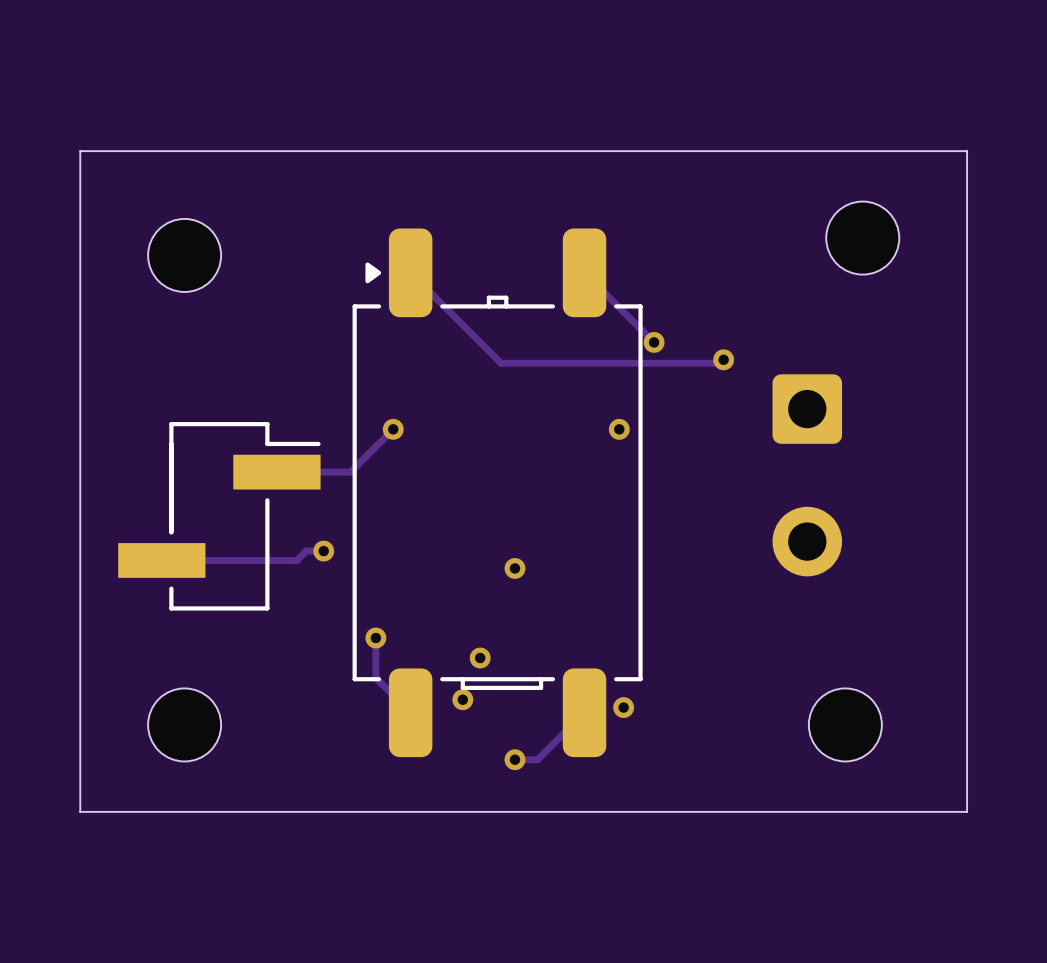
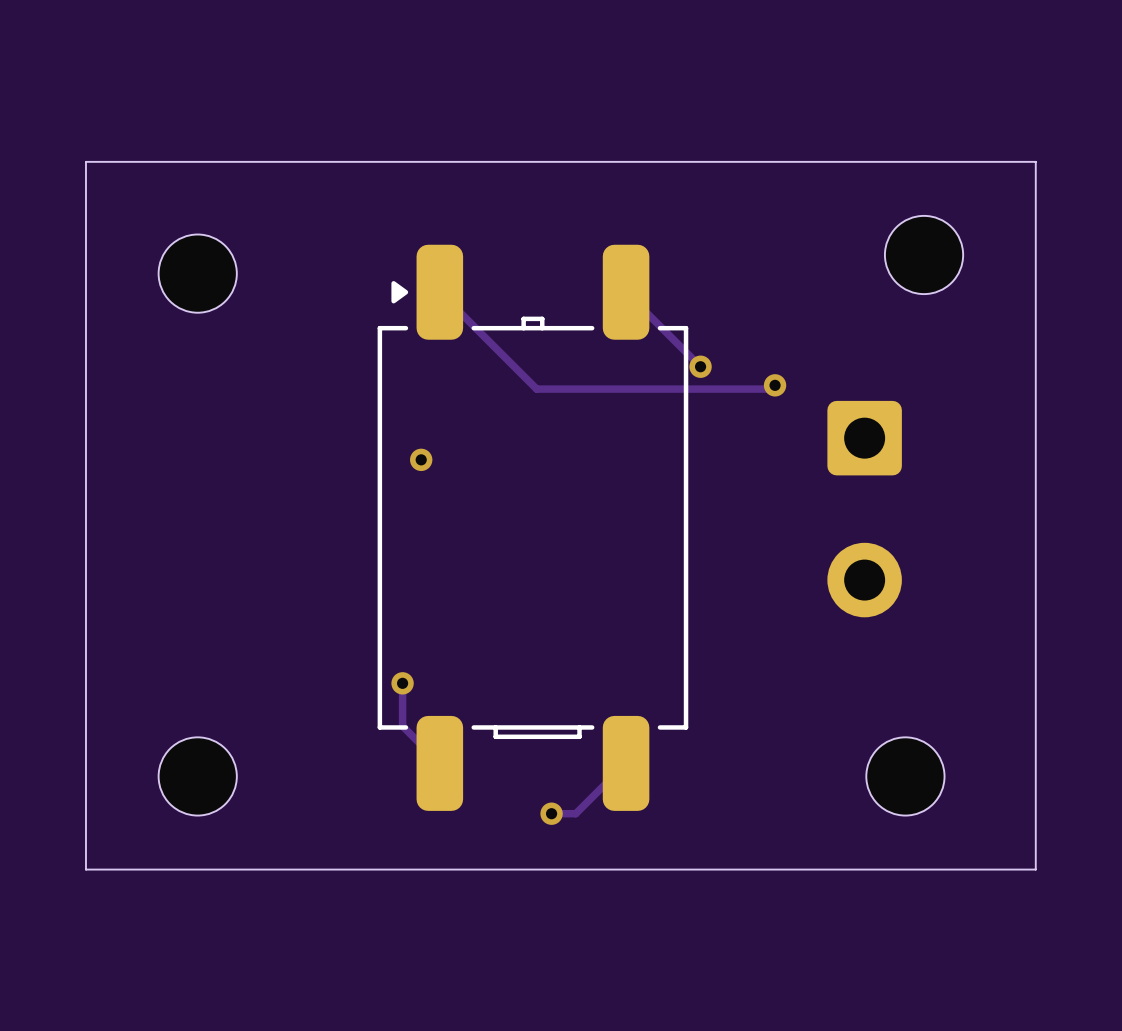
track: (393, 429) (350, 472) (276, 472) -> none
via: (619, 429) -> none
part: (219, 516) -> none
track: (323, 551) (306, 551) (296, 560) (161, 560) -> none
via: (323, 551) -> none
via: (514, 568) -> none
via: (480, 658) -> none
via: (462, 699) -> none
via: (623, 707) -> none

